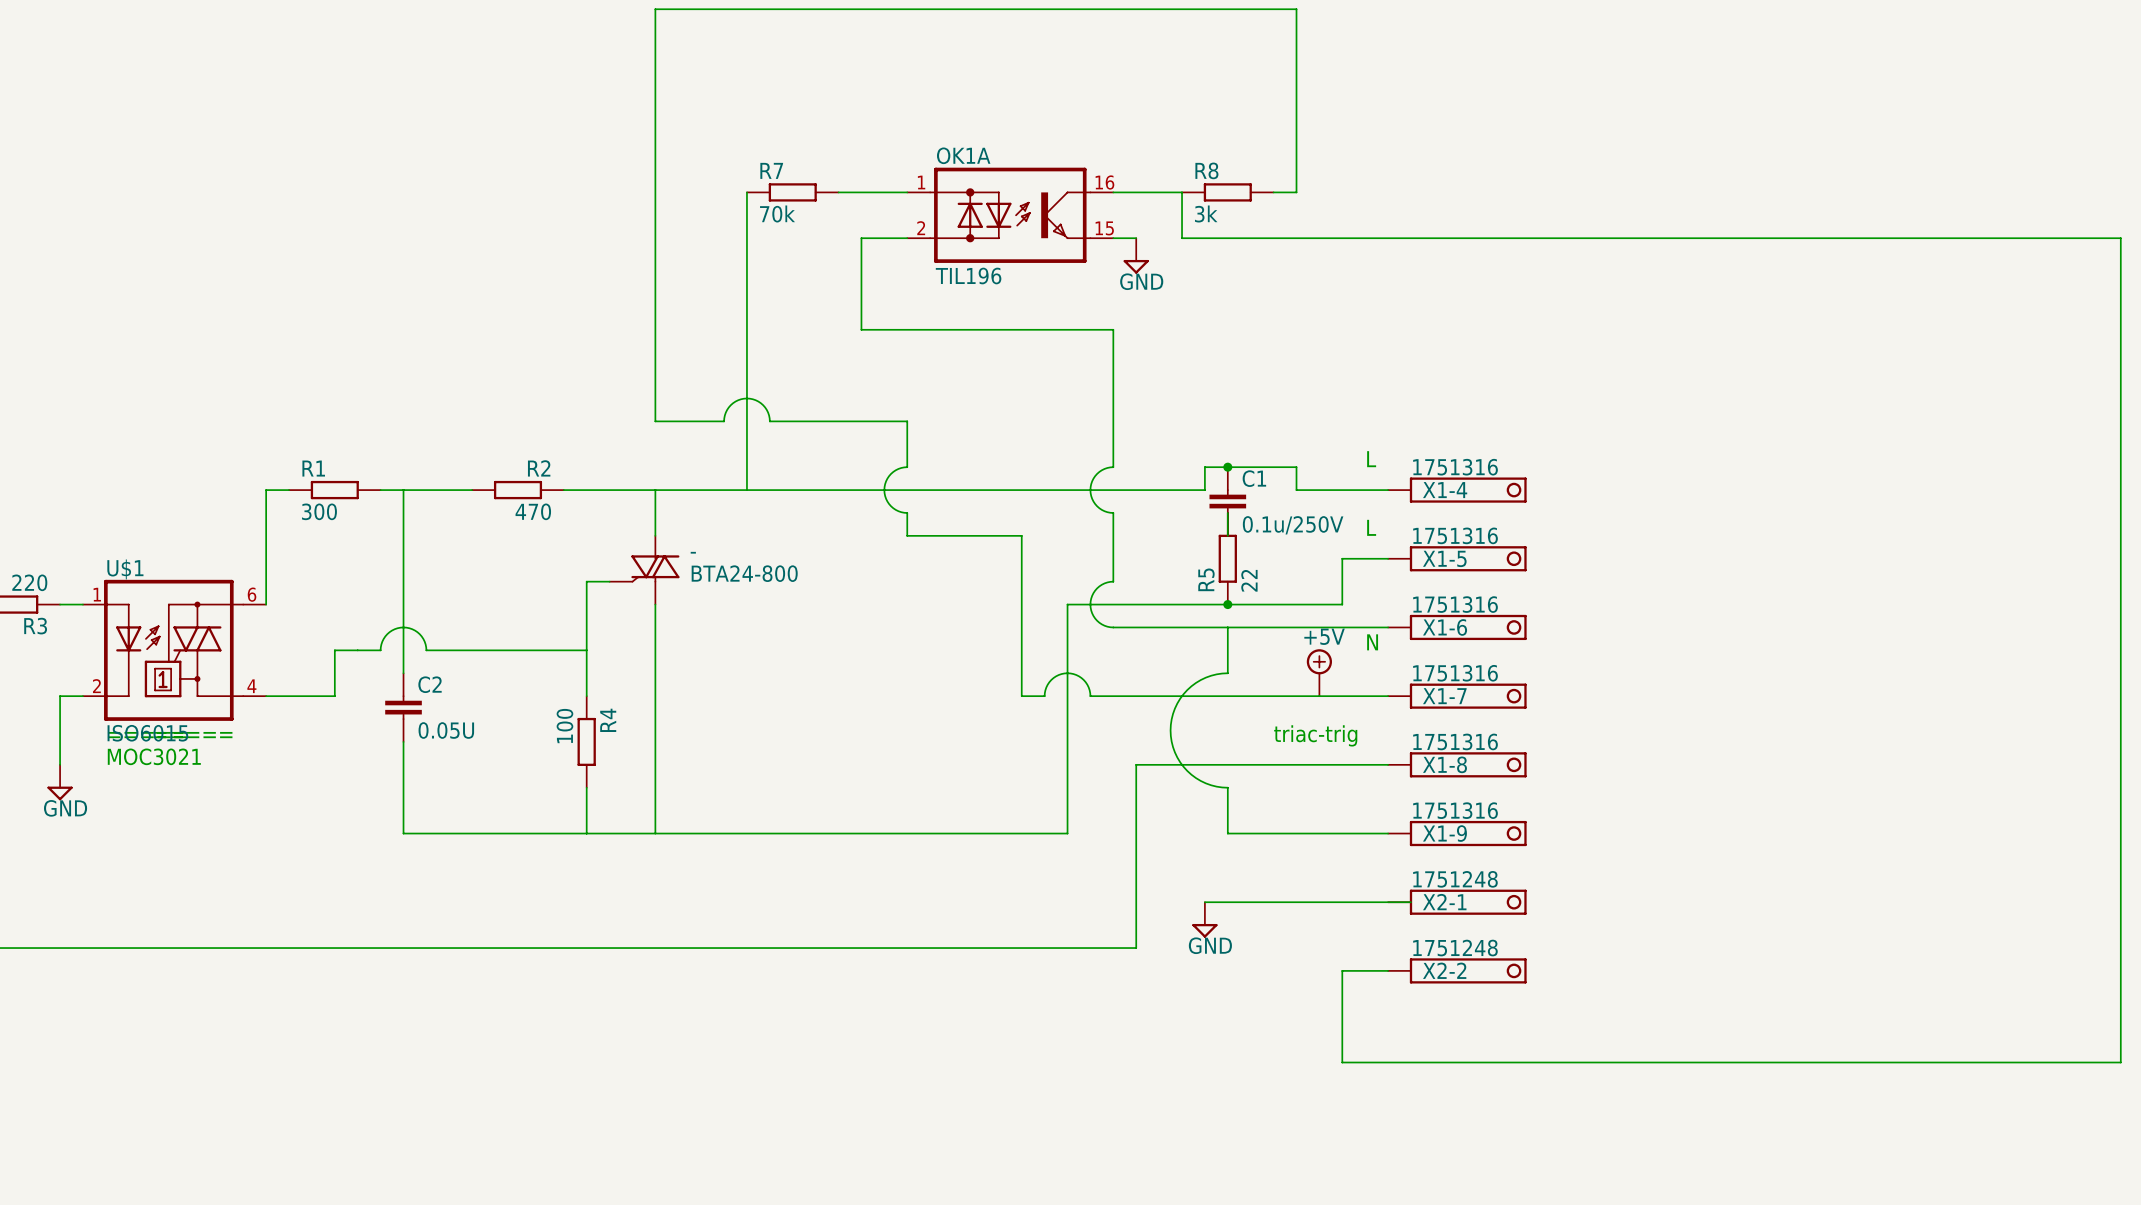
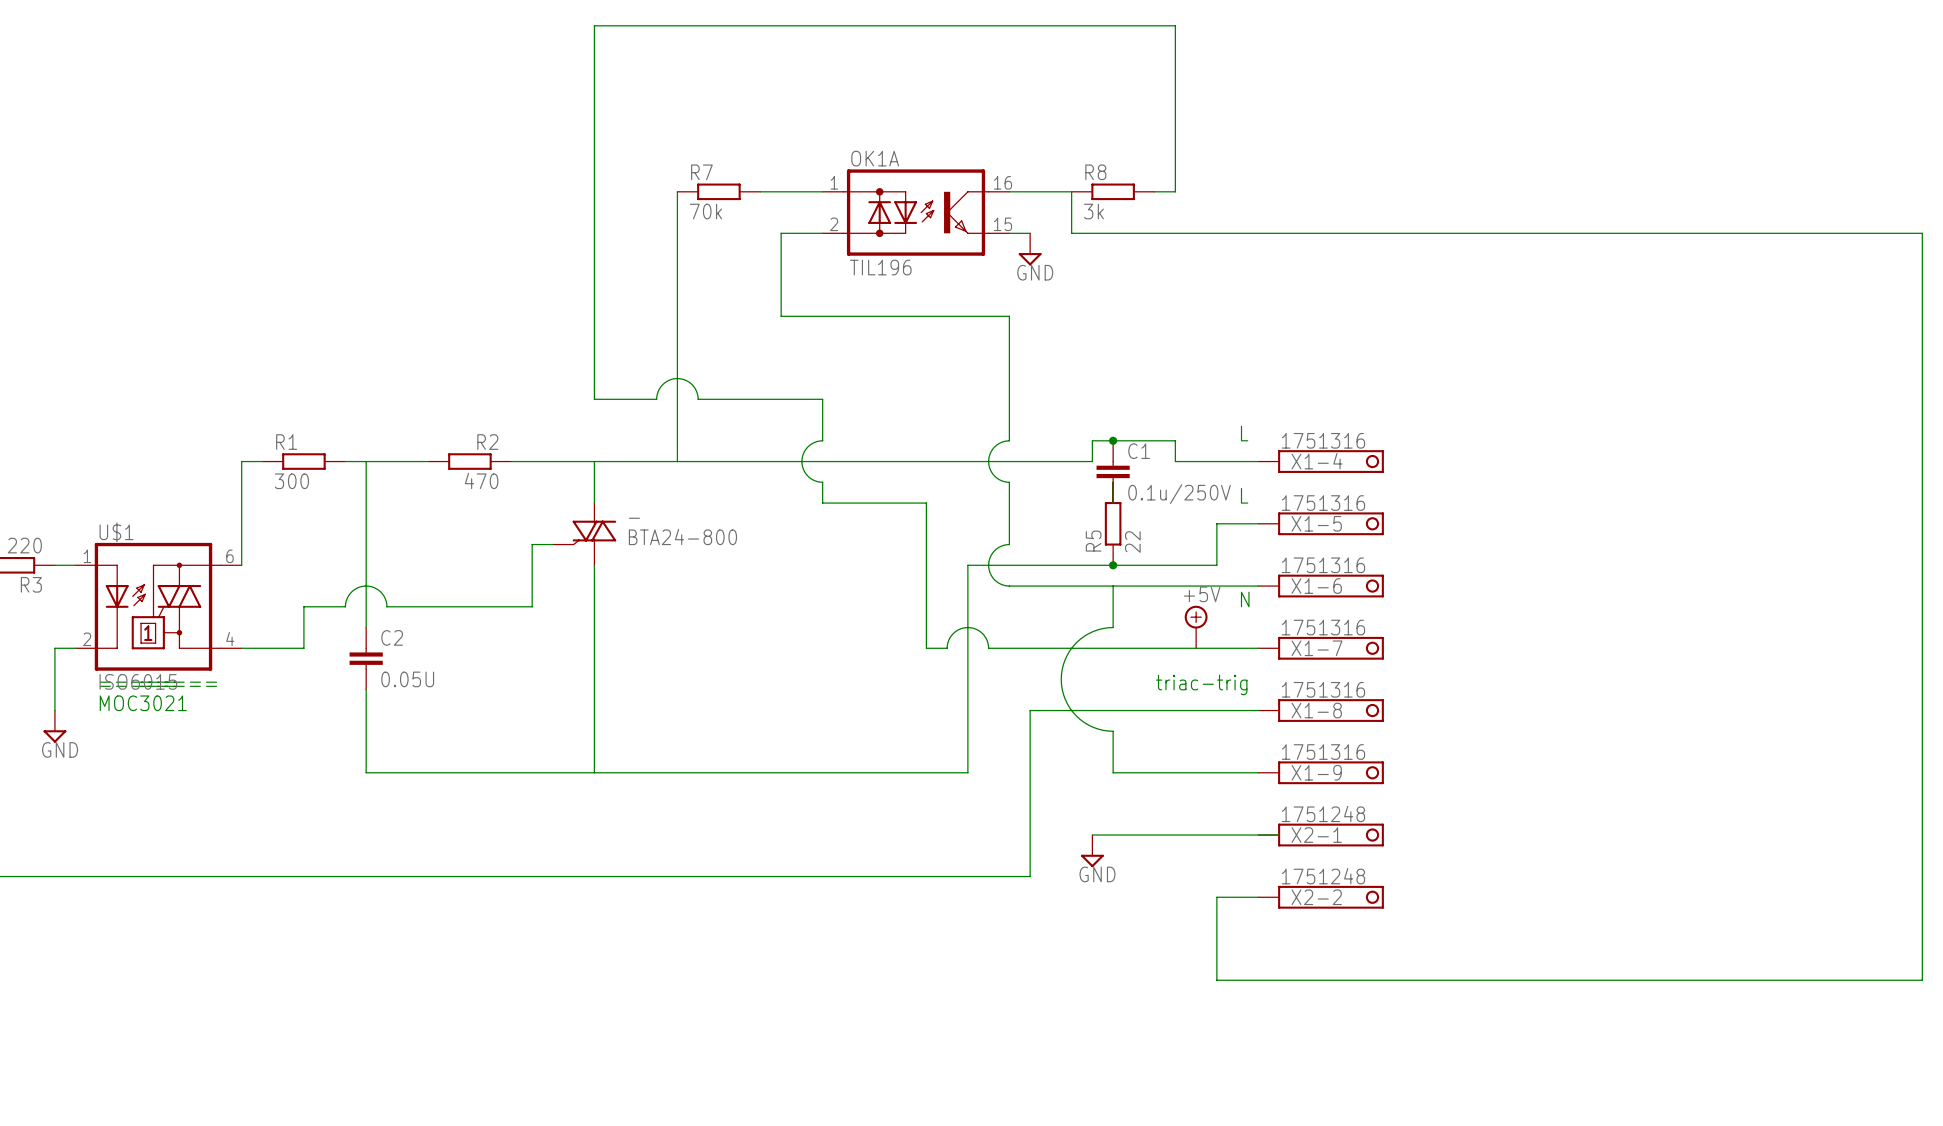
wire: (586, 650) (586, 696) -> none
R4: 100 (586, 741) -> none
wire: (586, 787) (586, 833) -> none

